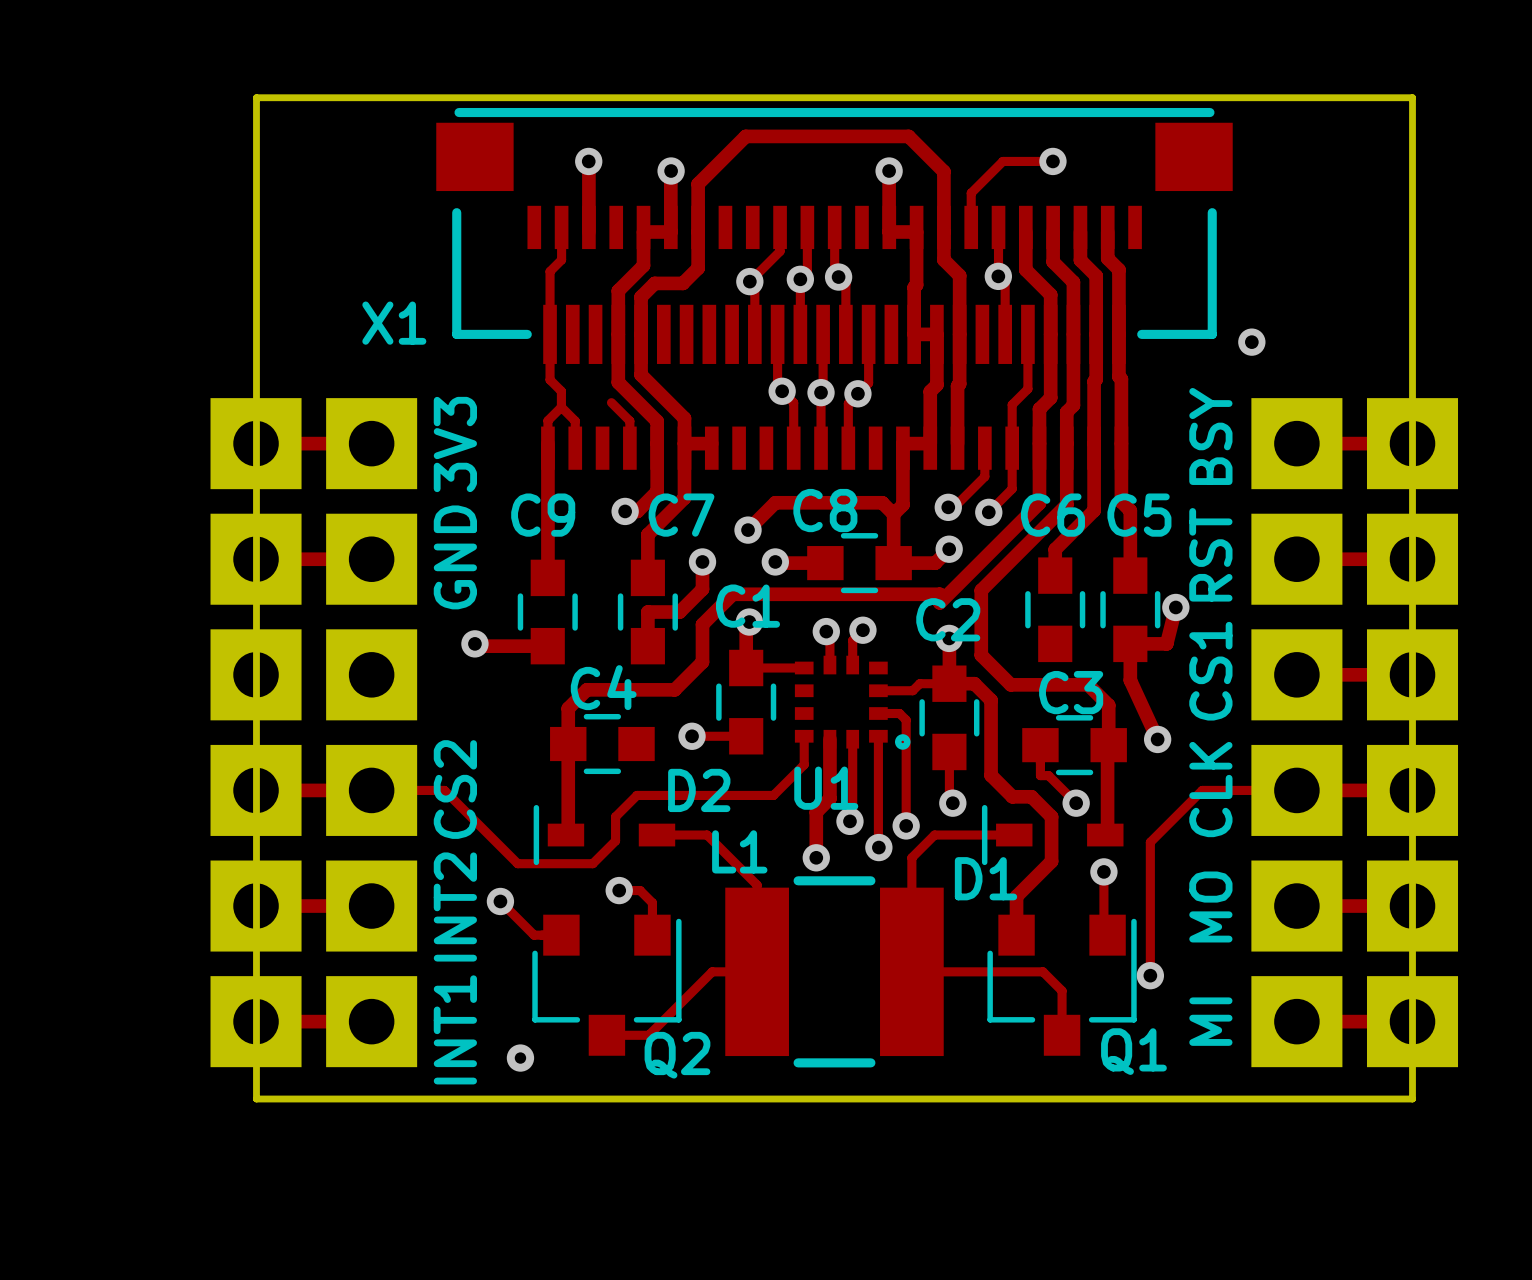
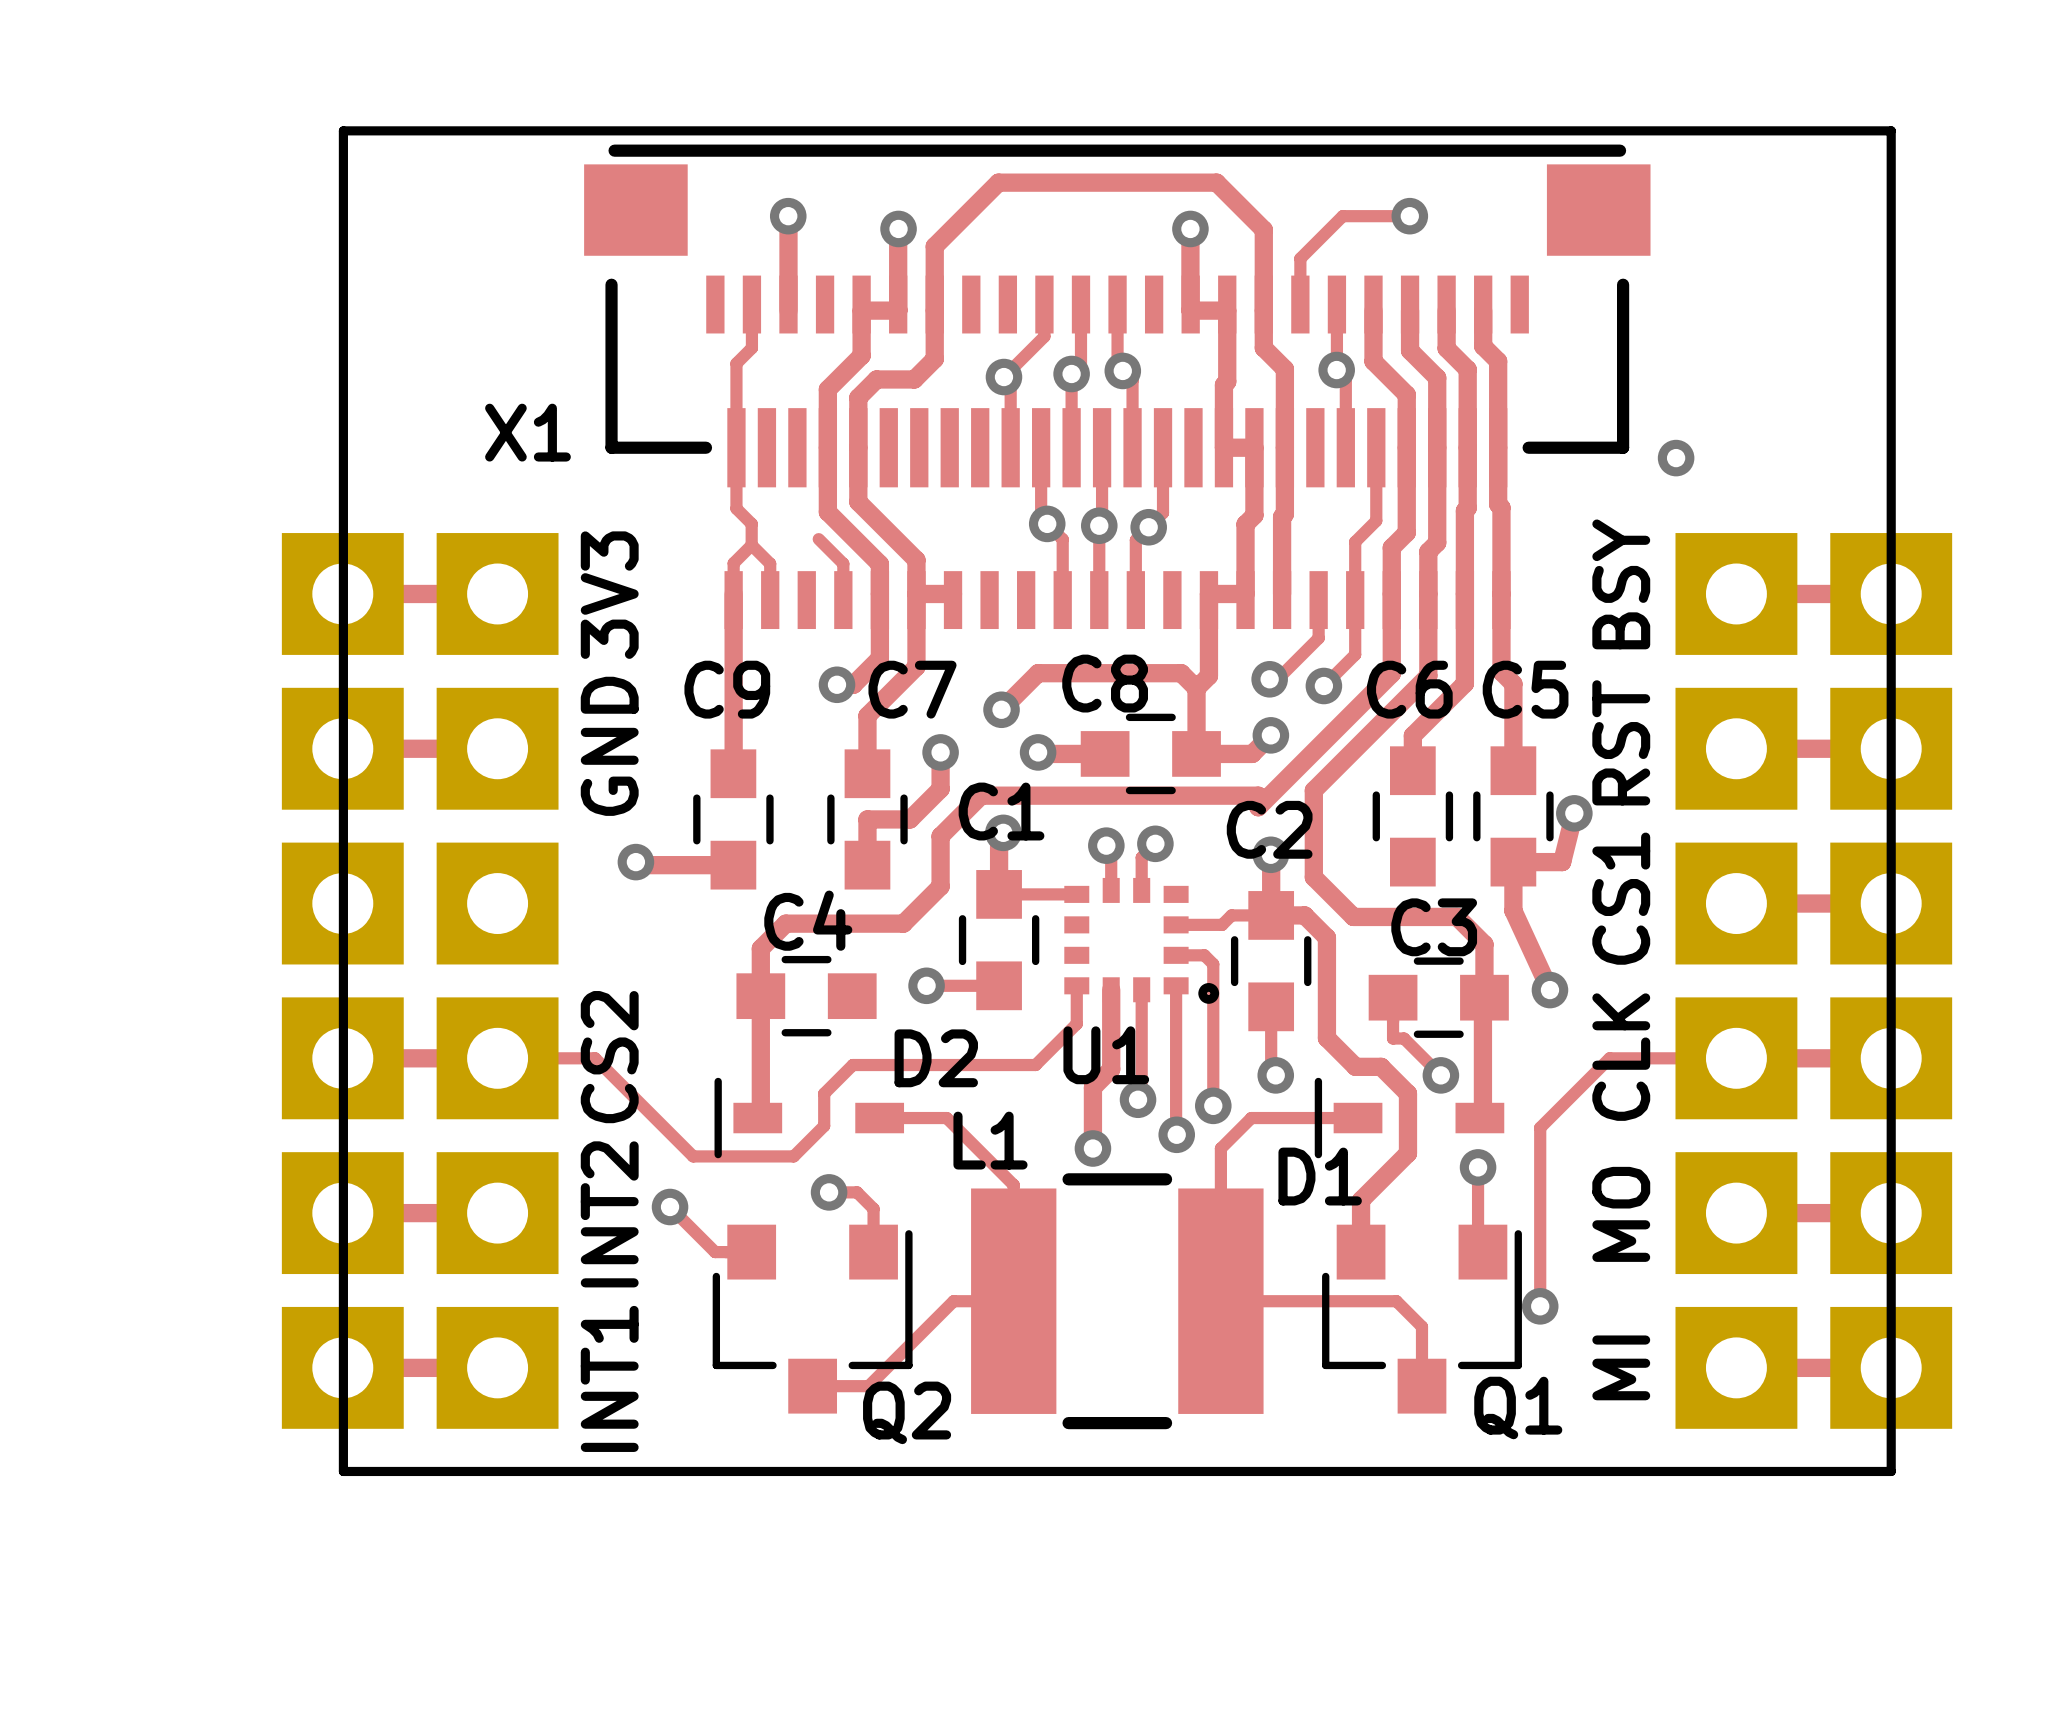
via: (520, 1058) -> none

